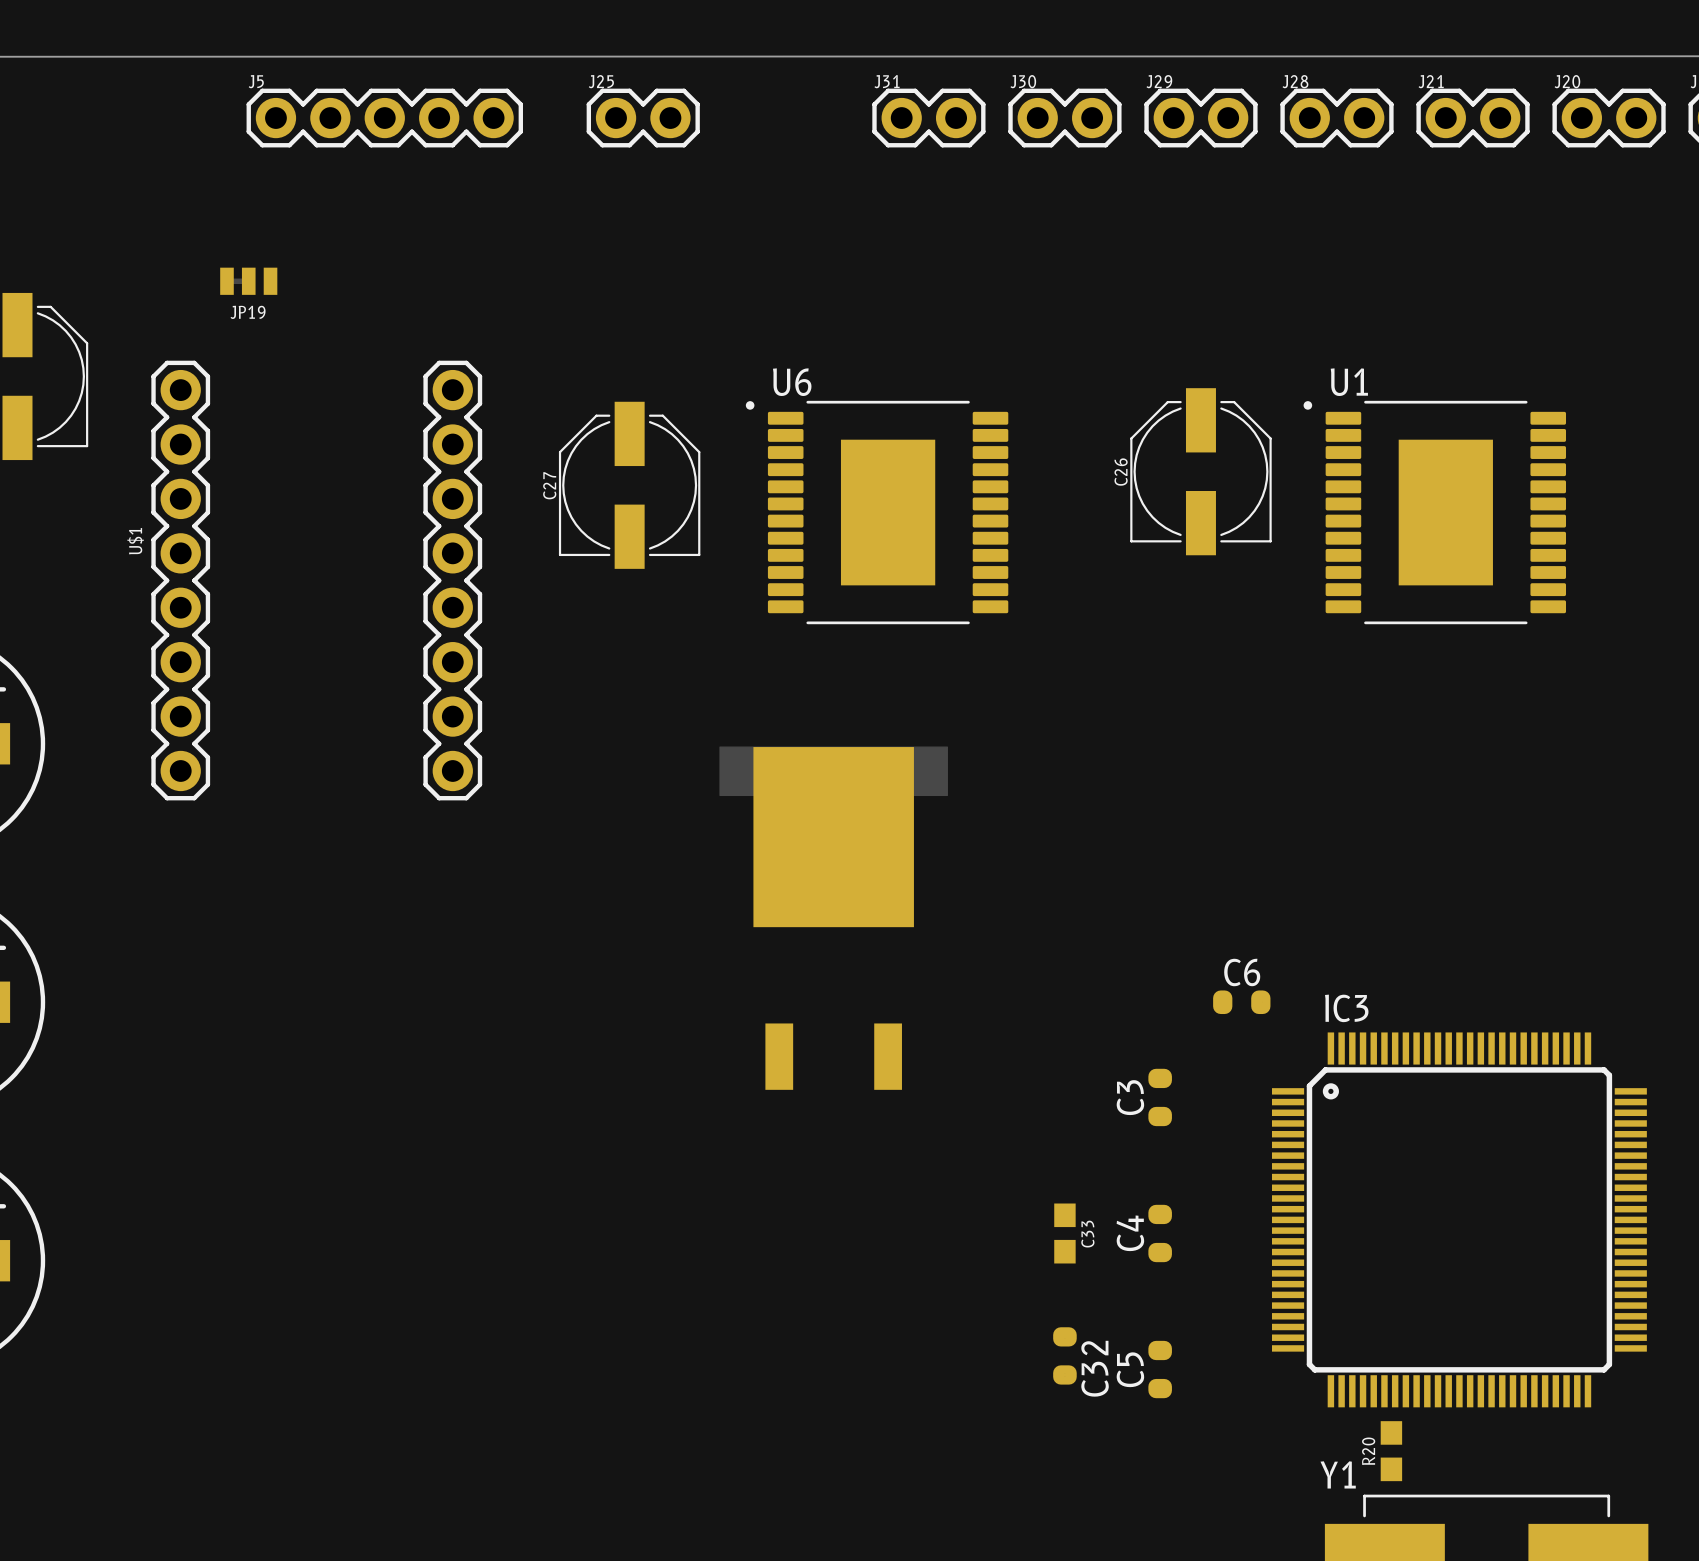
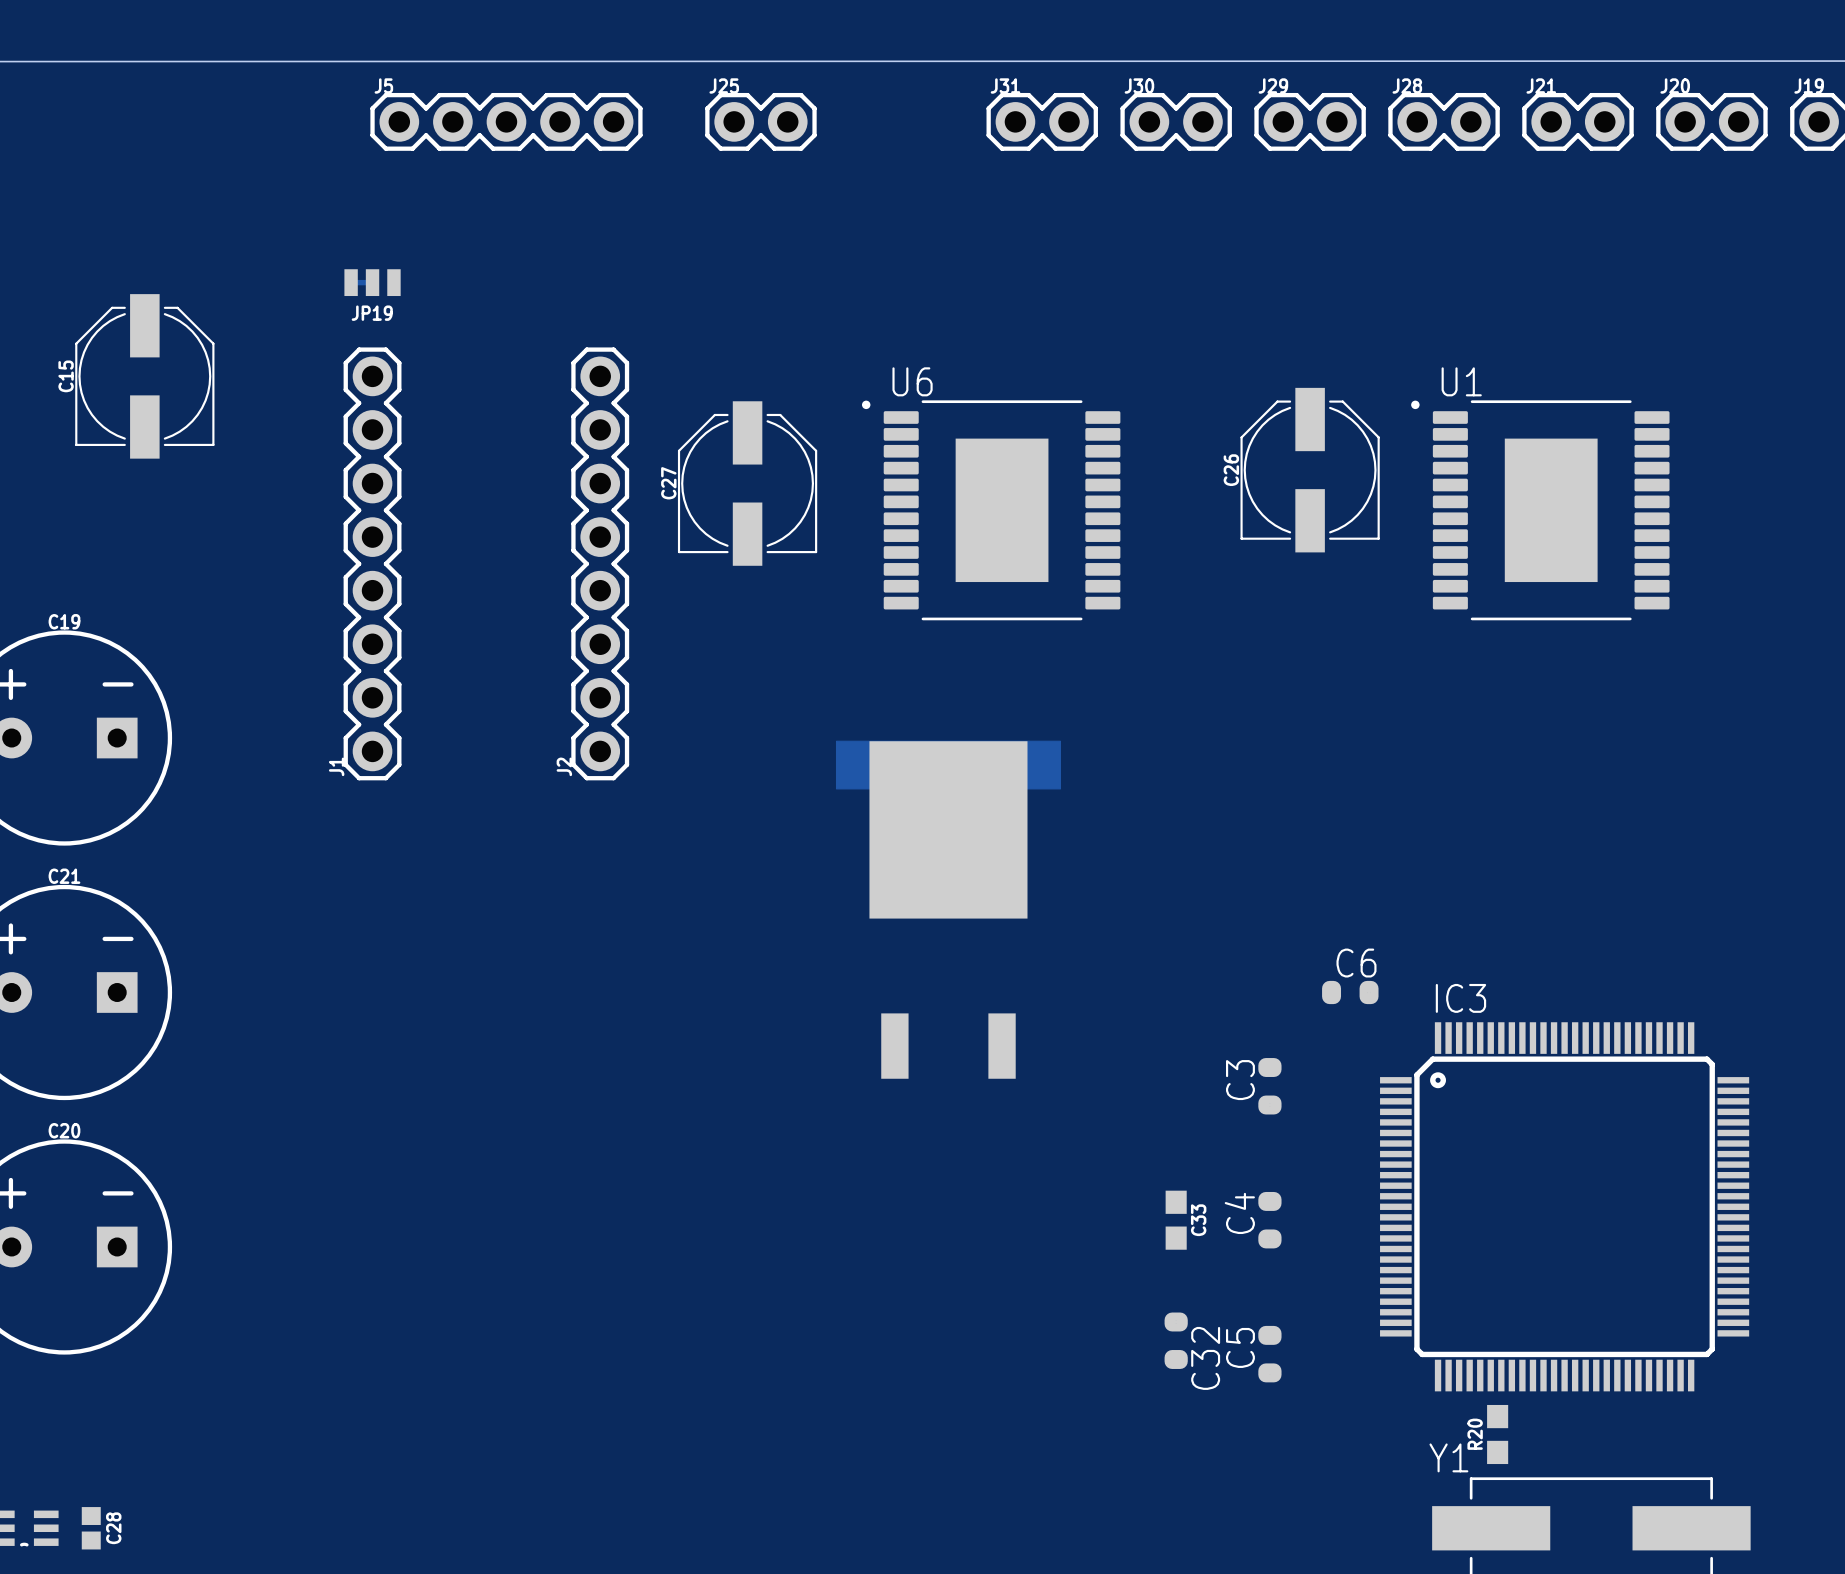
J1: none -> (372, 563)
J2: none -> (600, 563)
U$1: (316, 580) -> none

